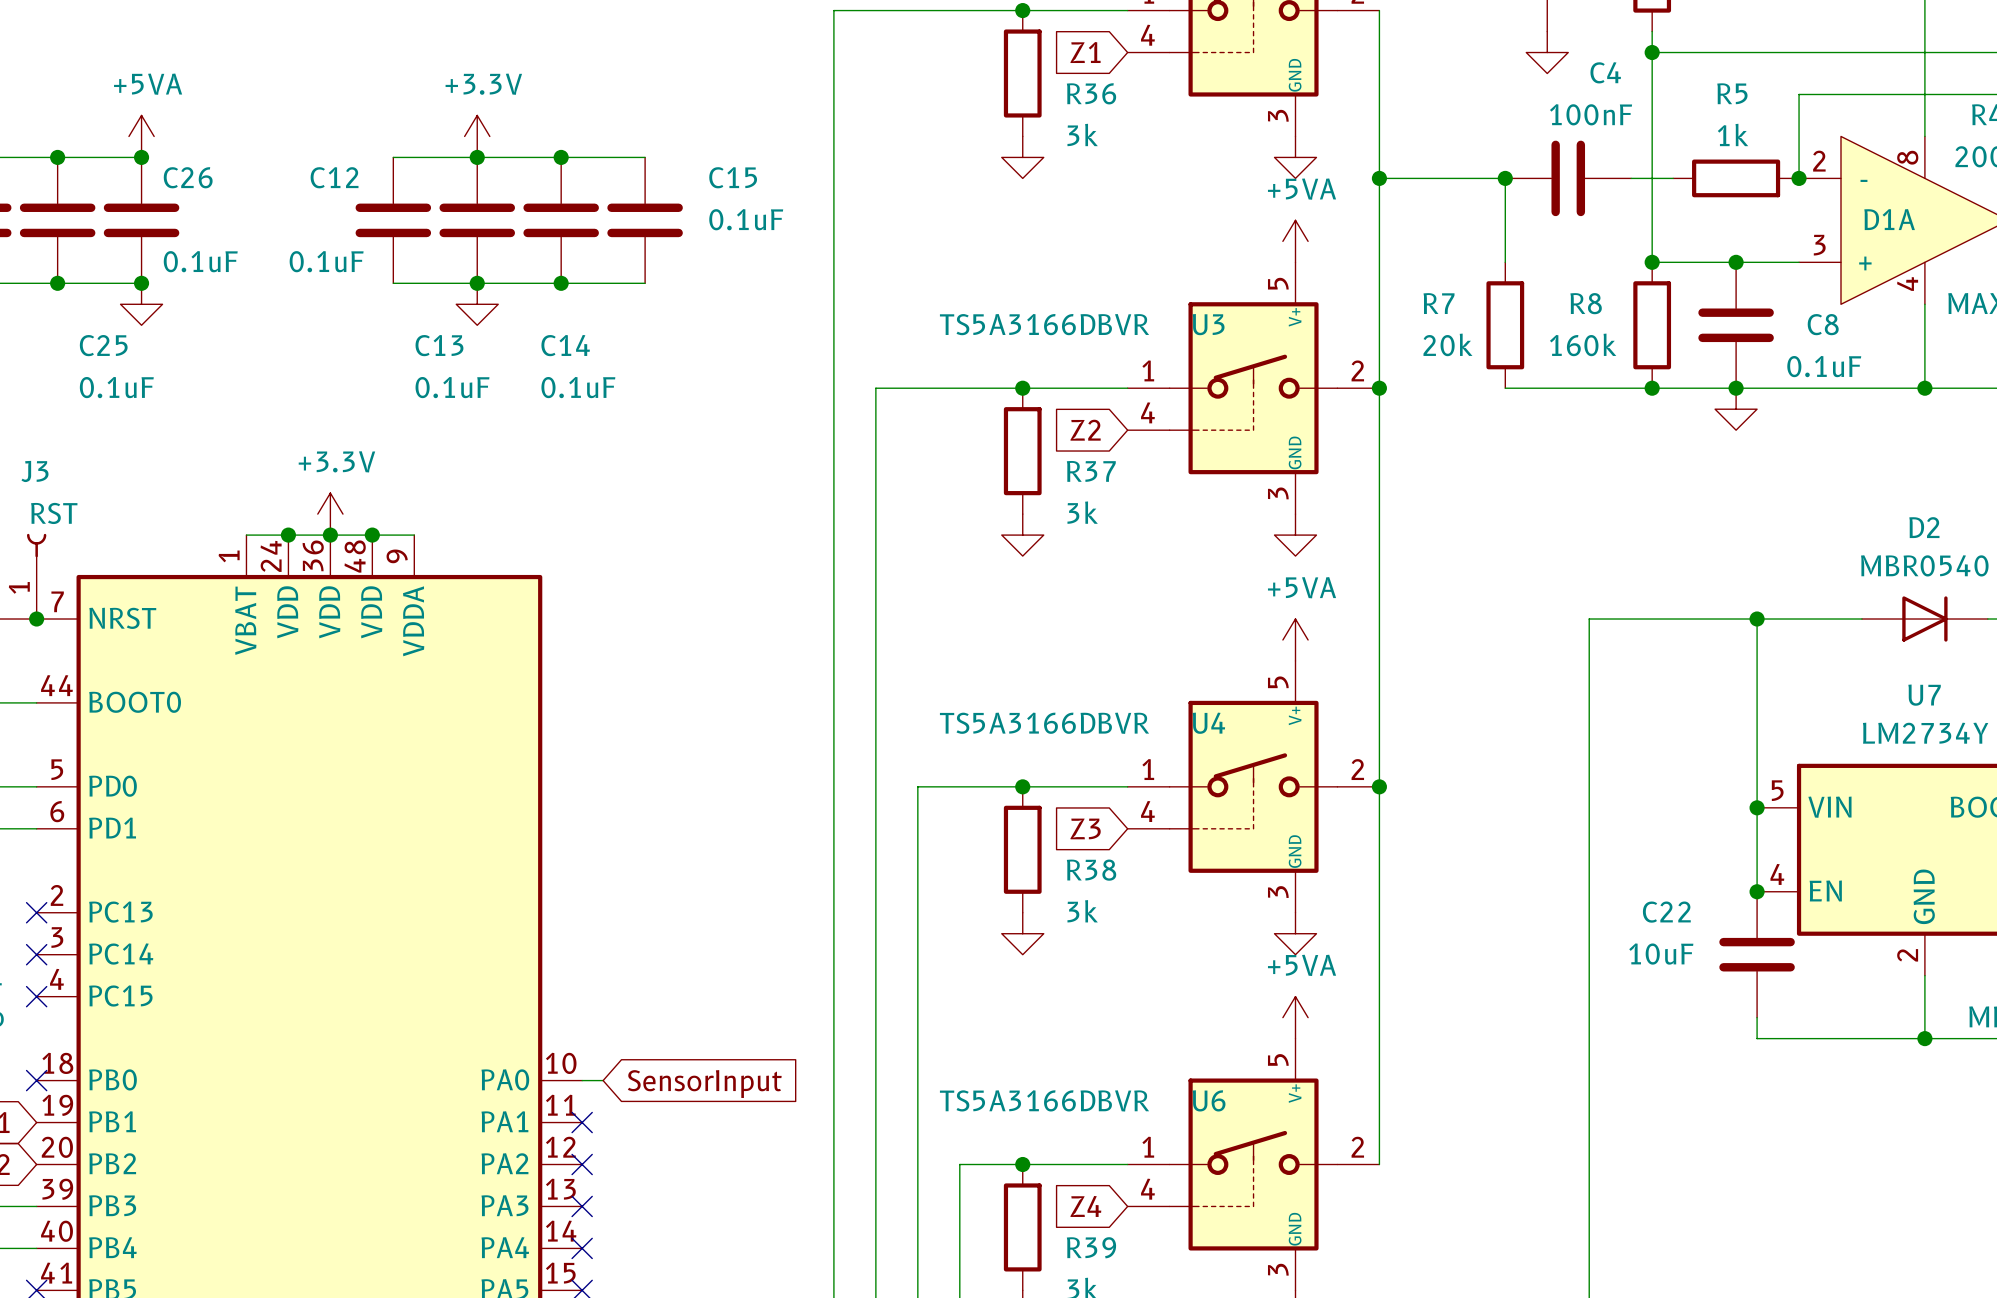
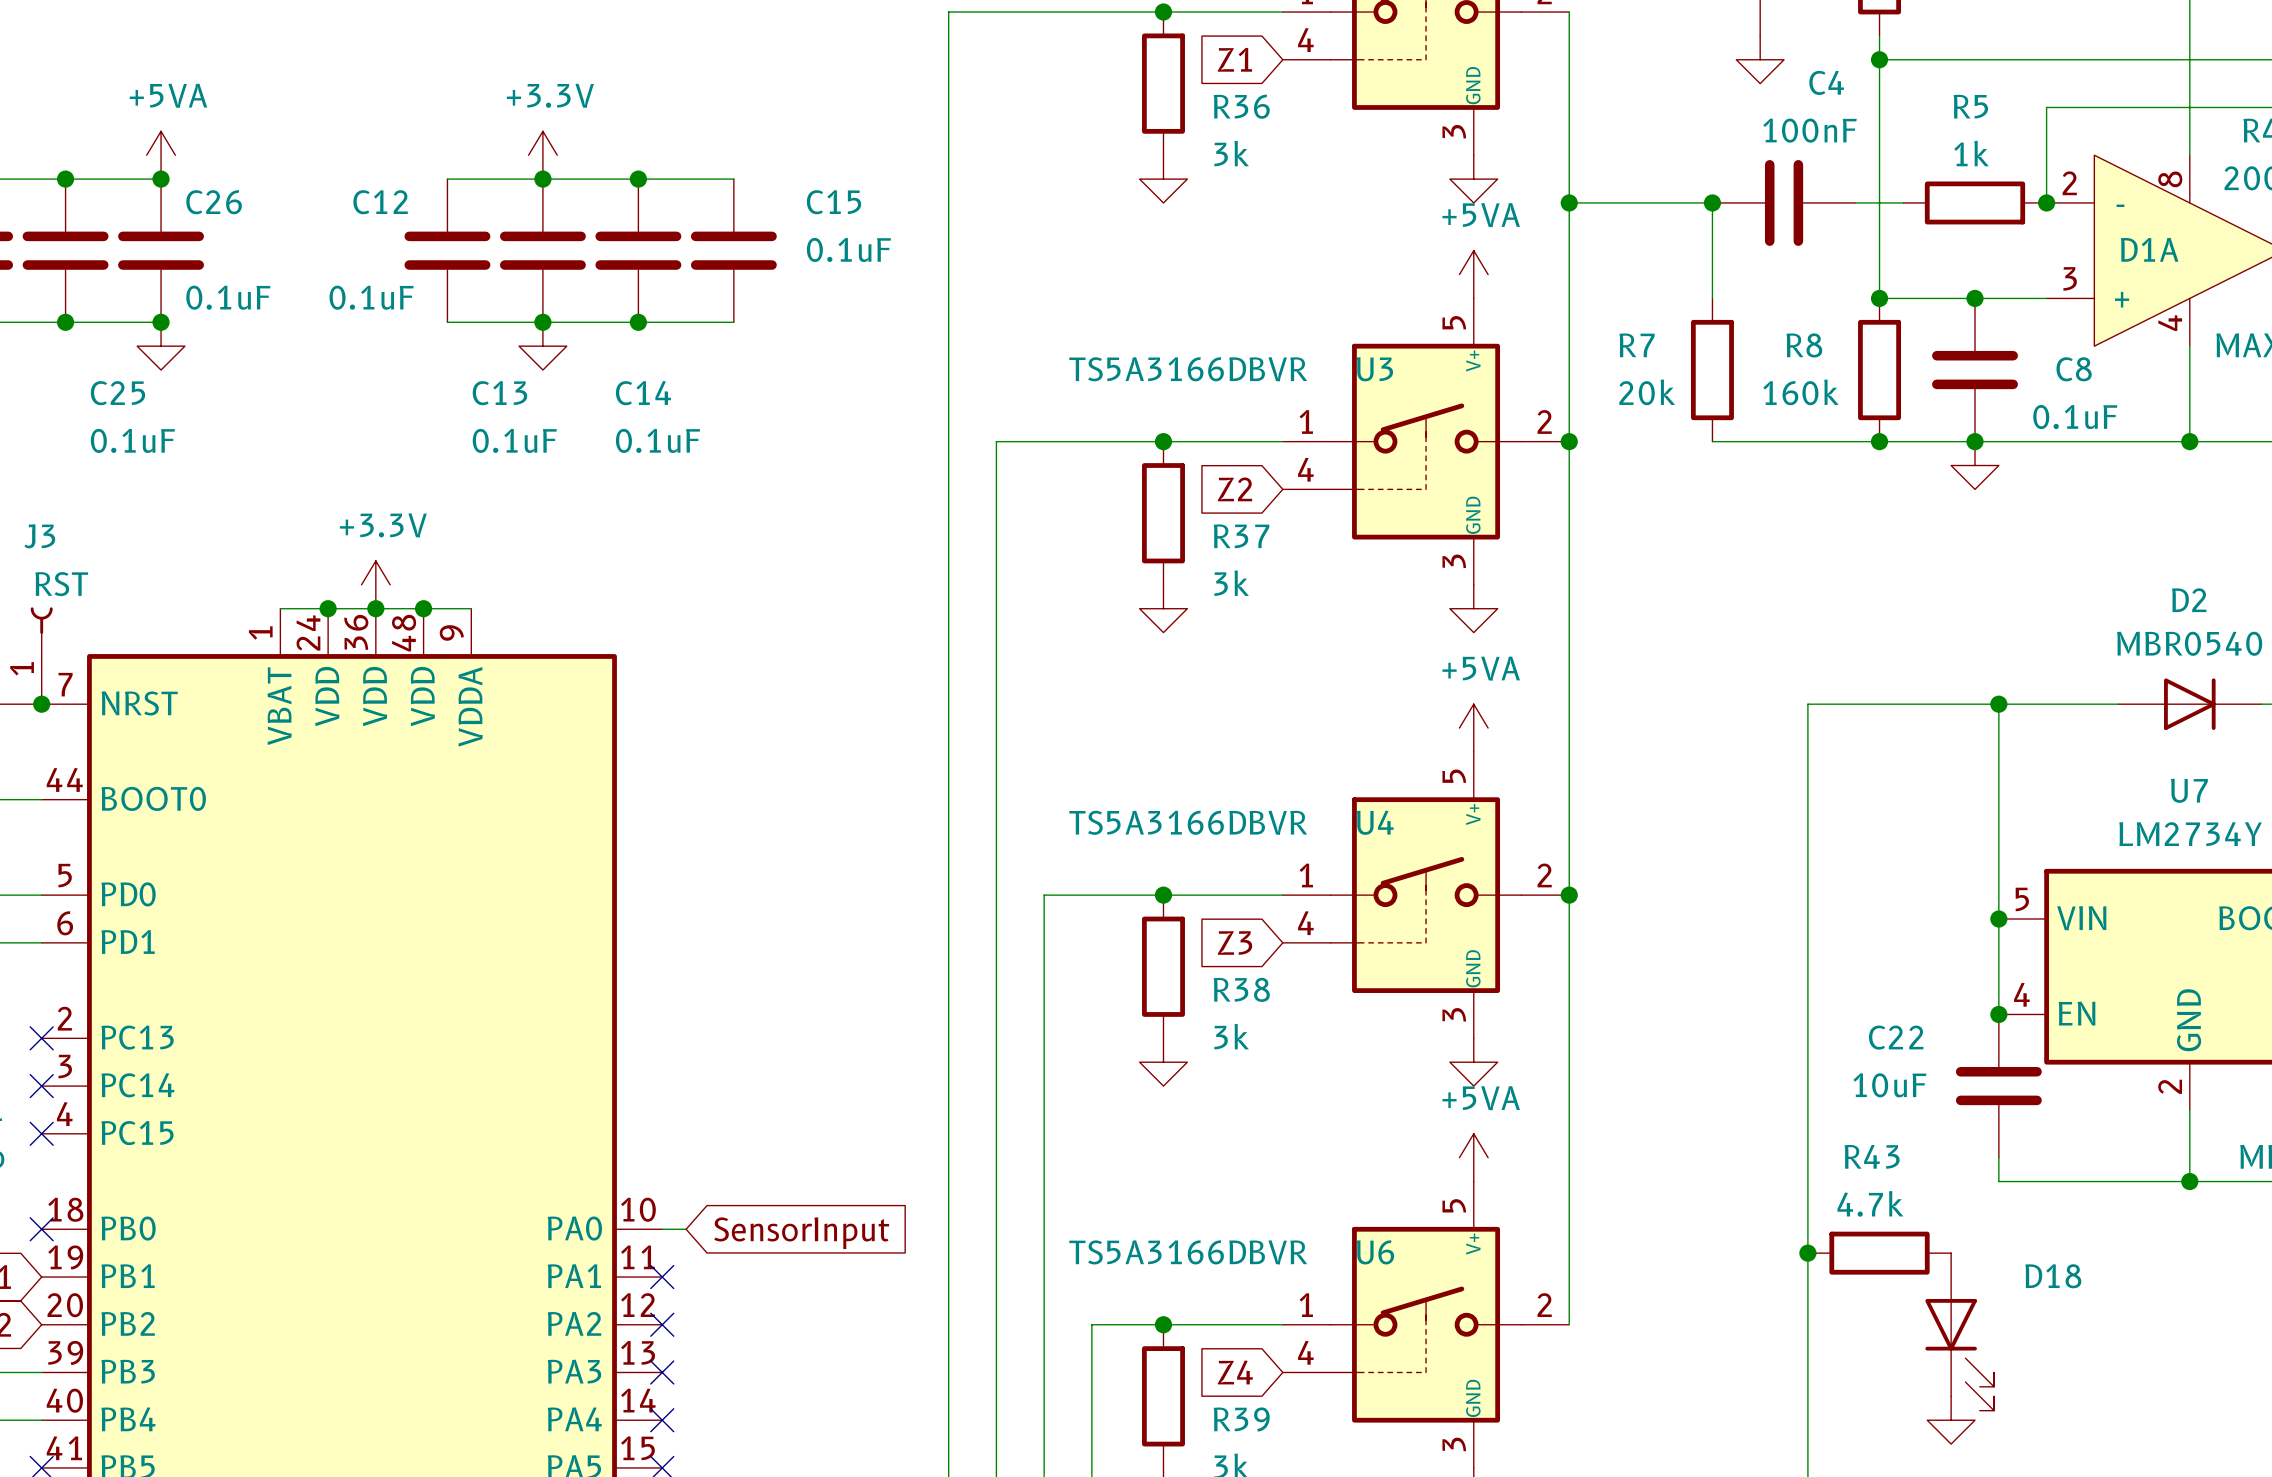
junction: none -> (1807, 1253)
R43: none -> 4.7k (1879, 1253)
D18: none -> (1959, 1331)
power symbol: none -> (1951, 1420)

